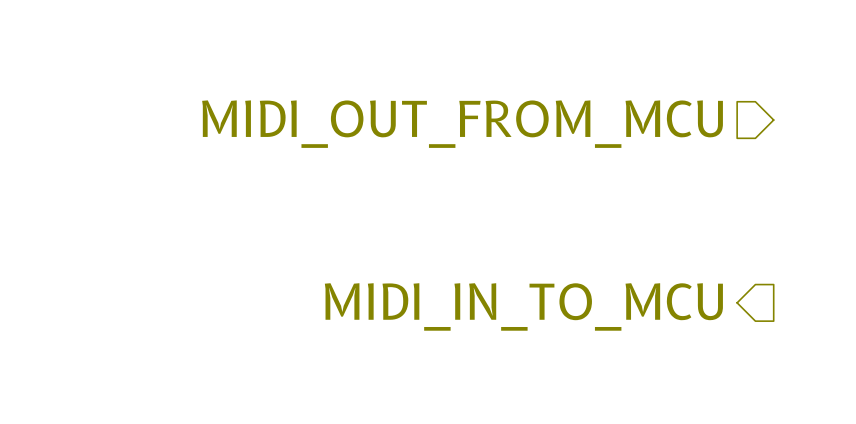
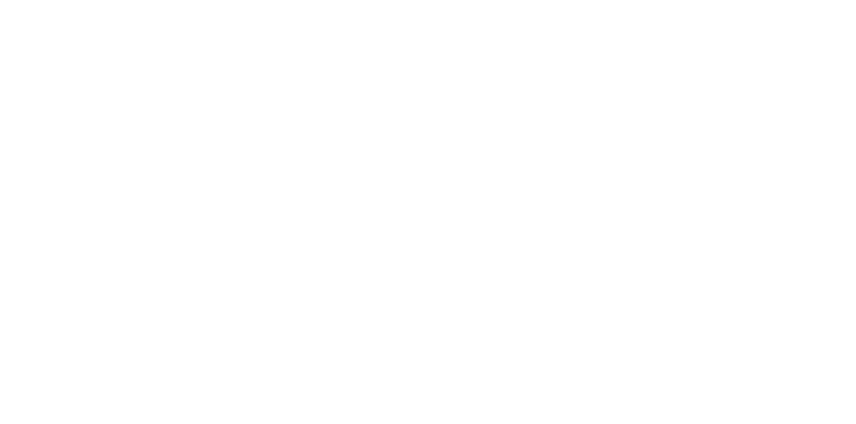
hierarchical label: MIDI_OUT_FROM_MCU (462, 124) -> none
hierarchical label: MIDI_IN_TO_MCU (523, 306) -> none

